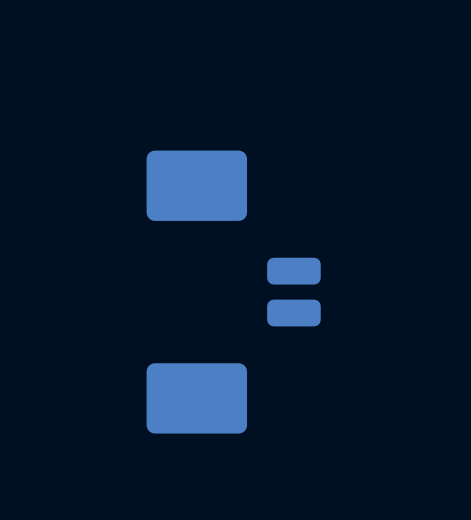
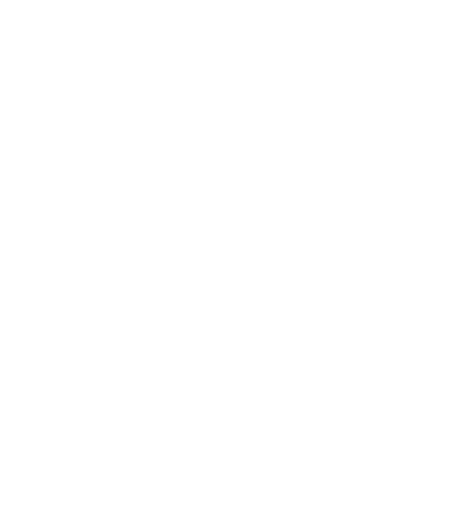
part: (233, 292) -> none

